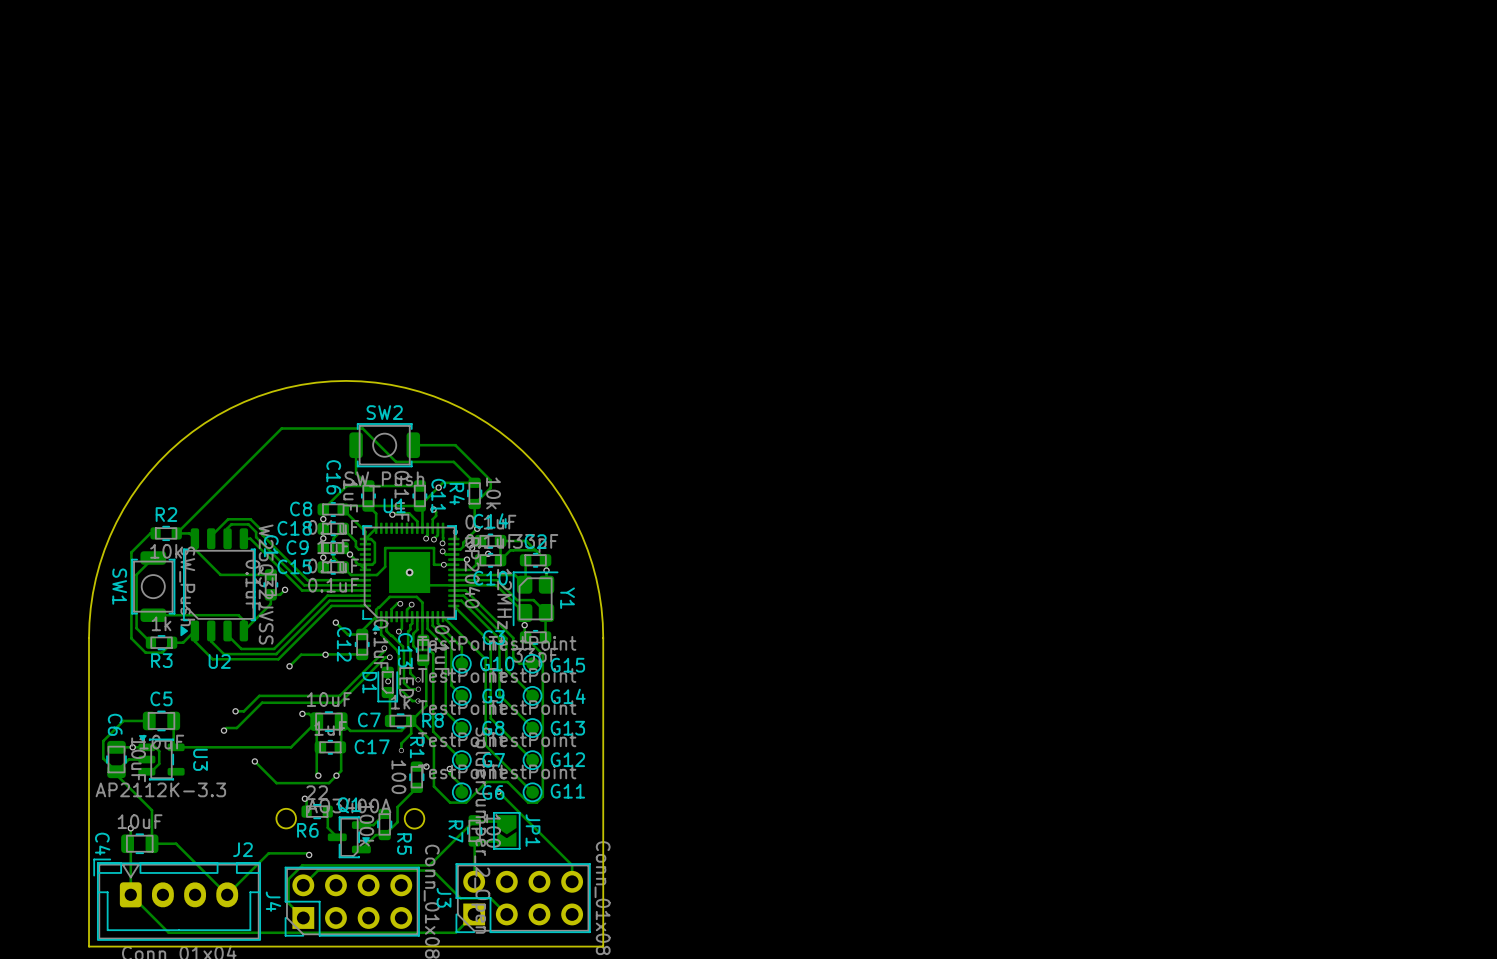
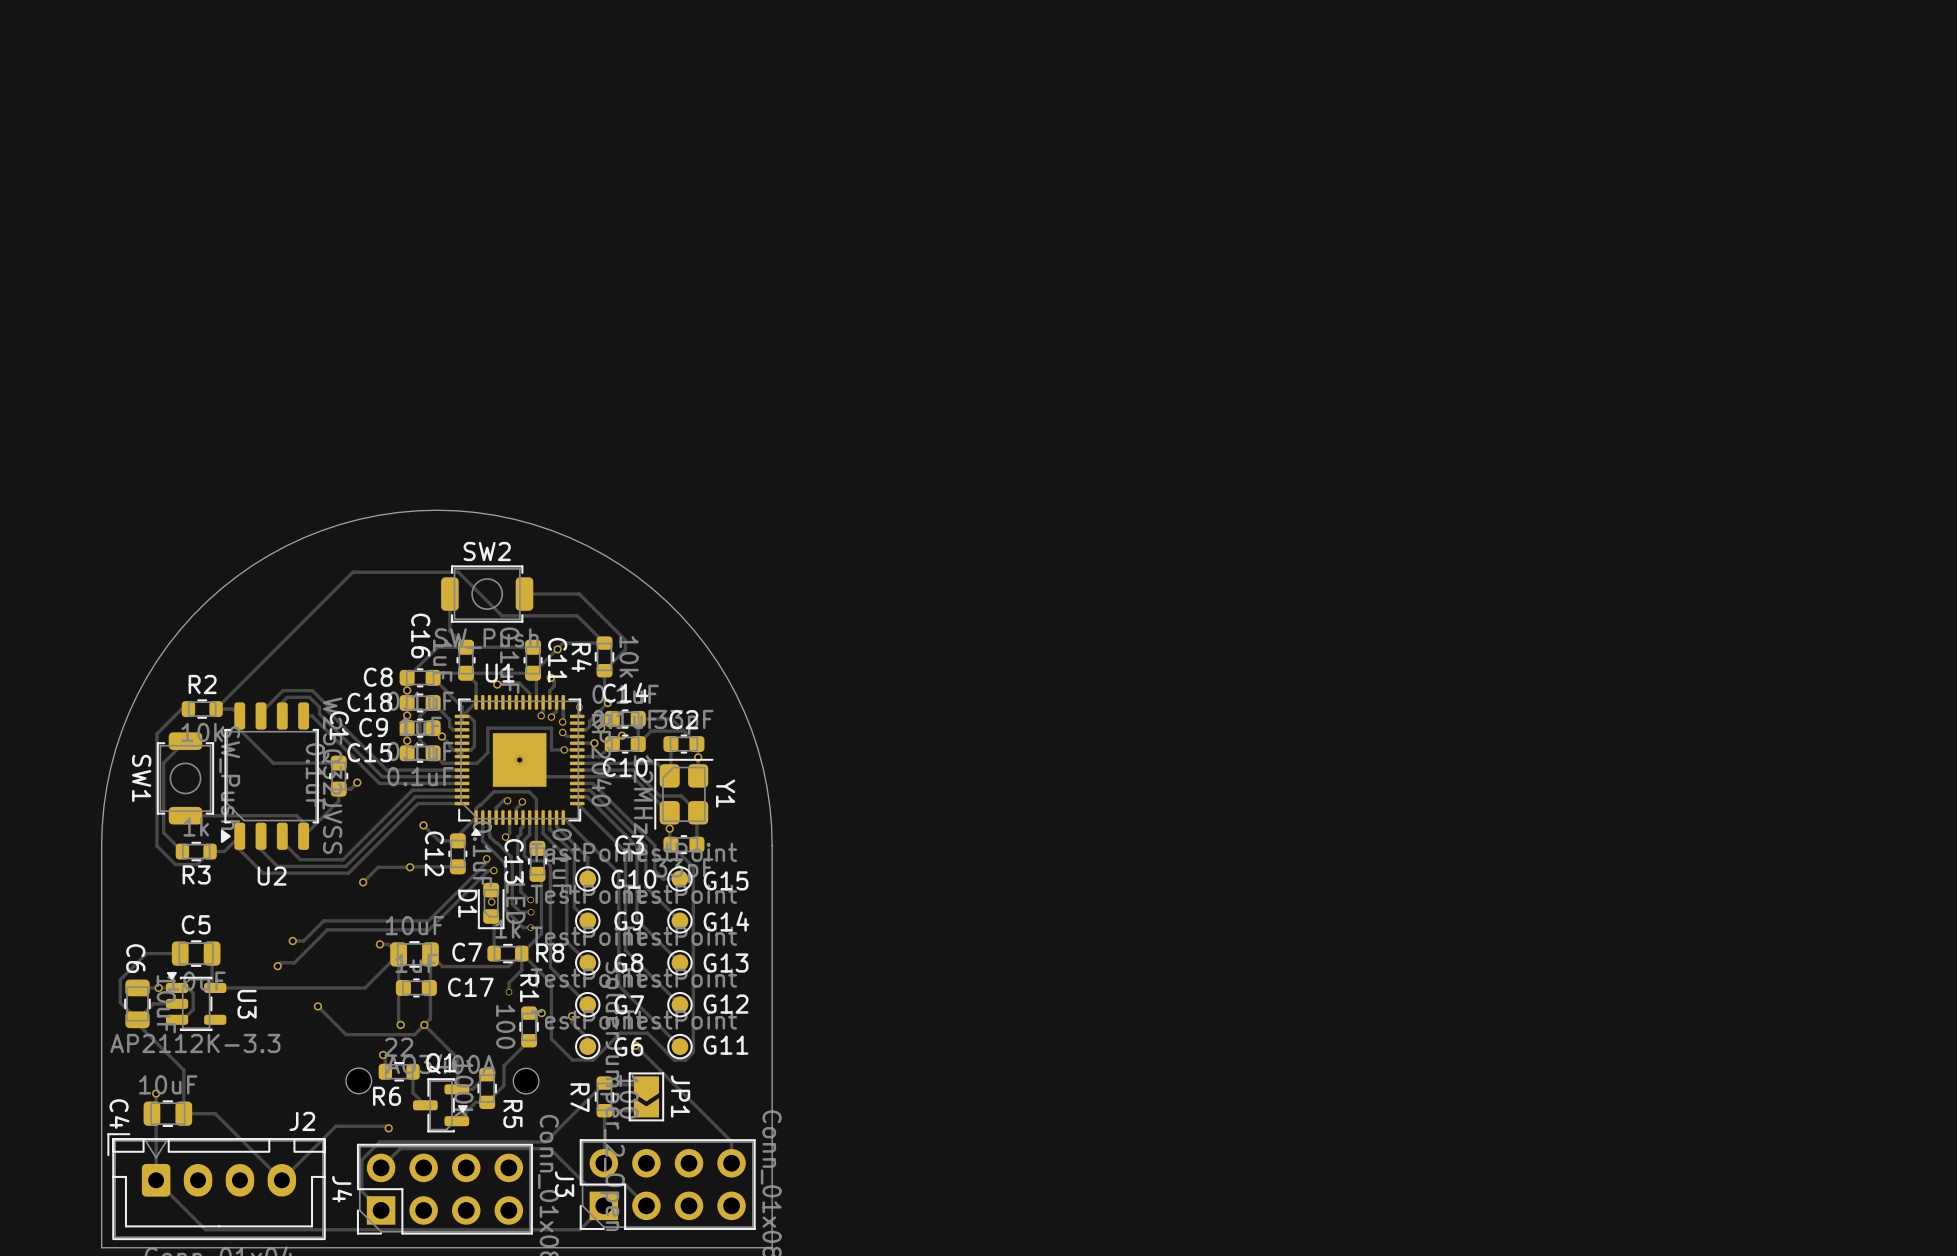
track: none -> (424, 1024) (457, 1058) (456, 1089)

